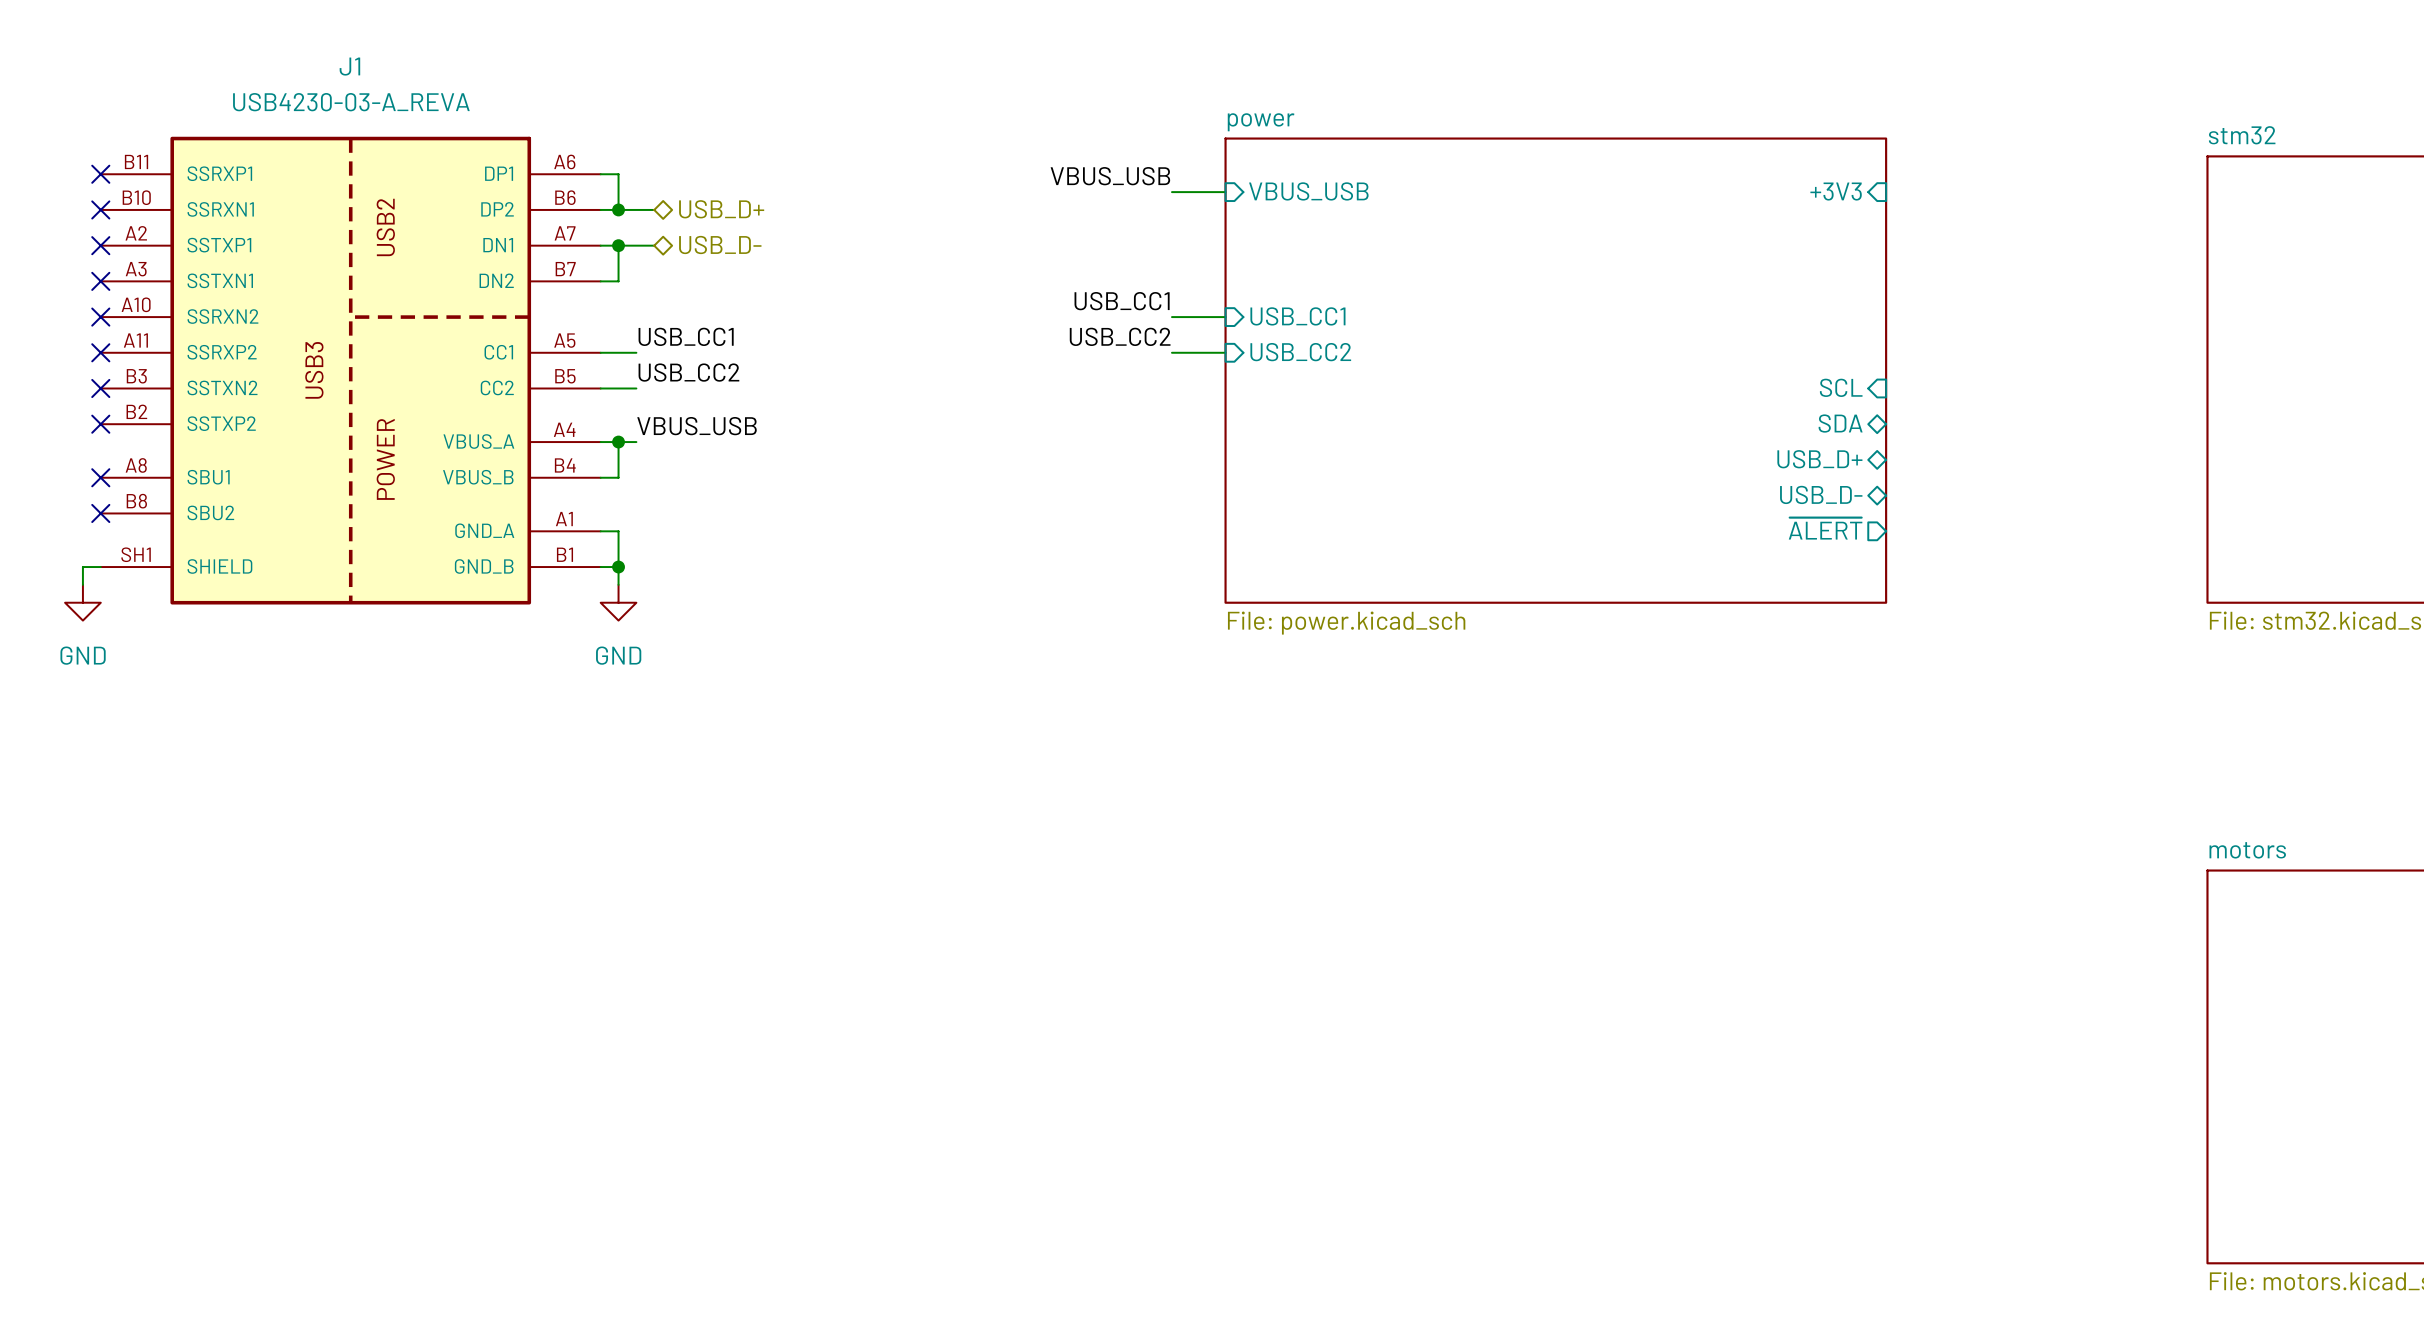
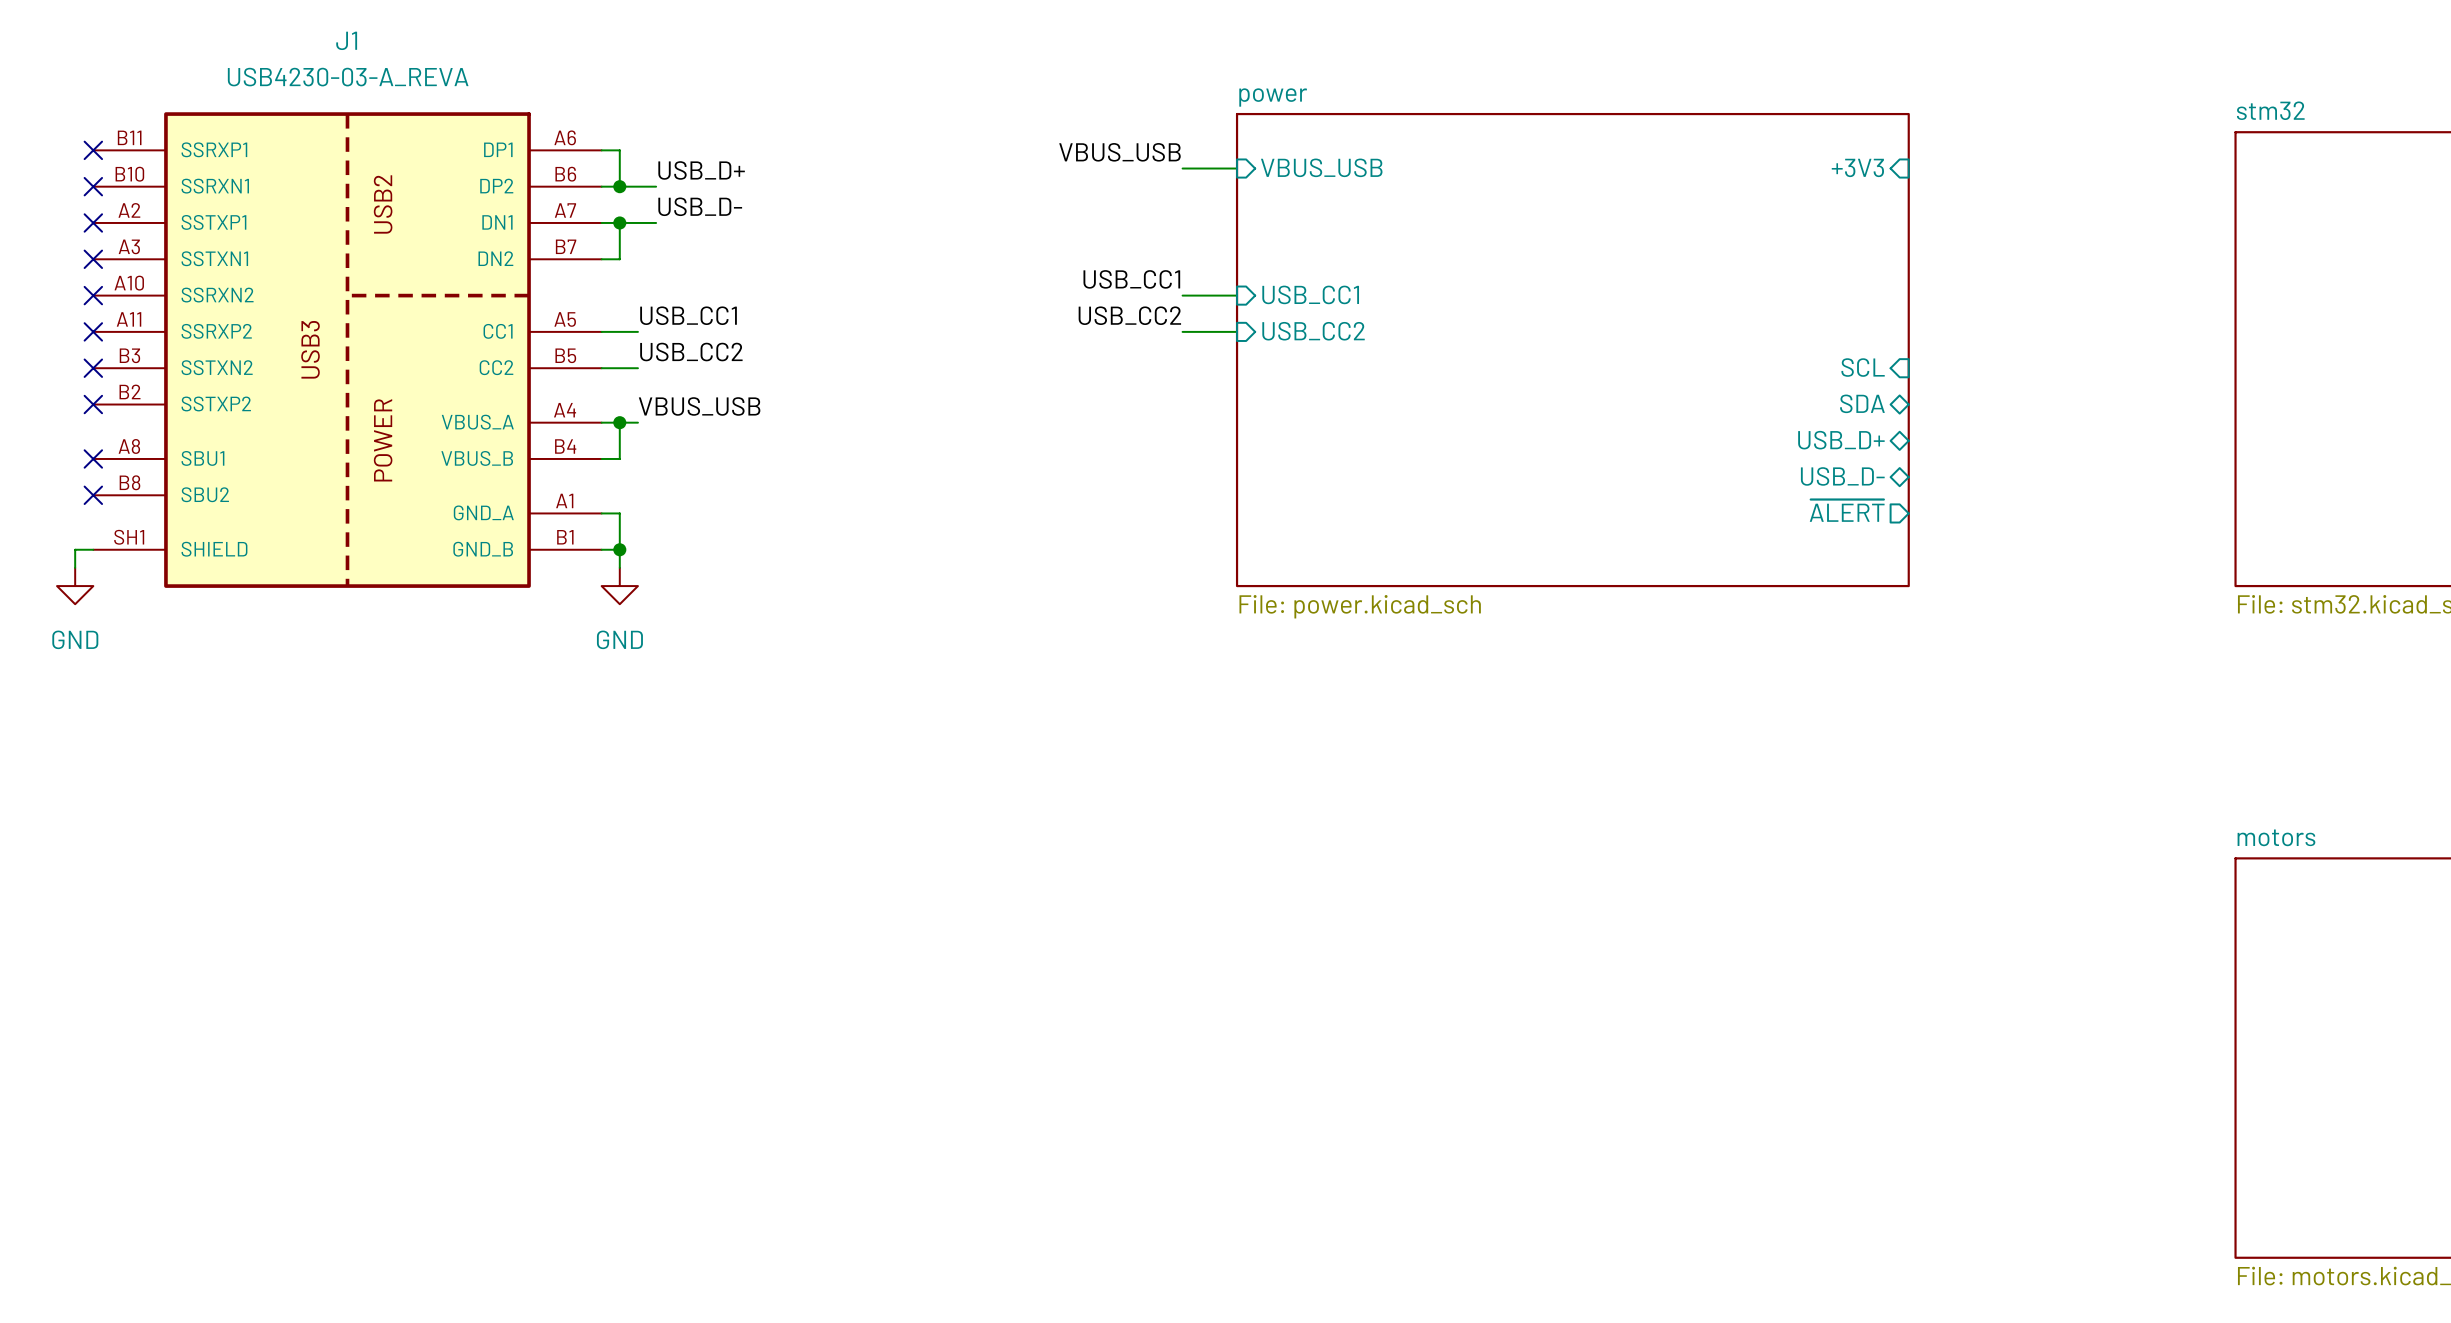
label: none -> USB_D+ (701, 170)
hierarchical label: USB_D+ (721, 209) -> none
label: none -> USB_D- (700, 206)
hierarchical label: USB_D- (720, 244) -> none

